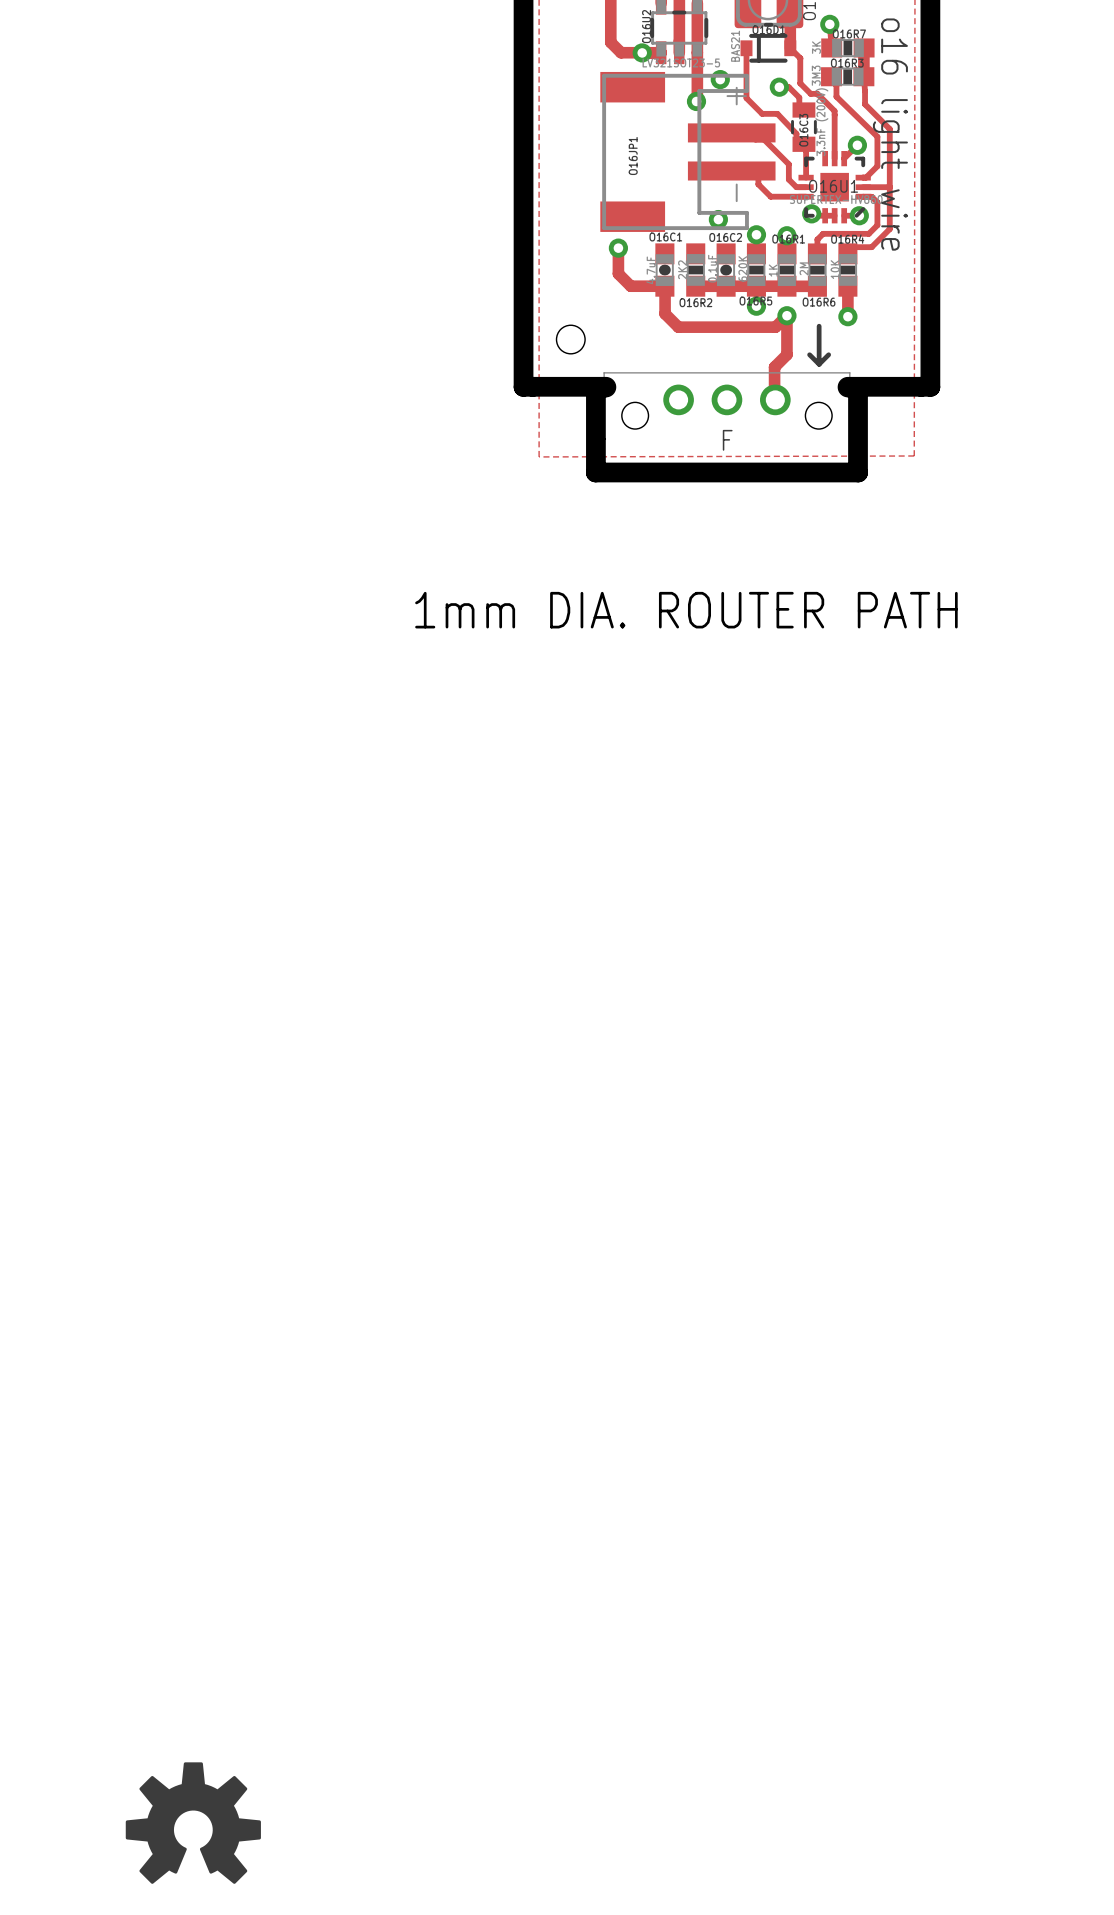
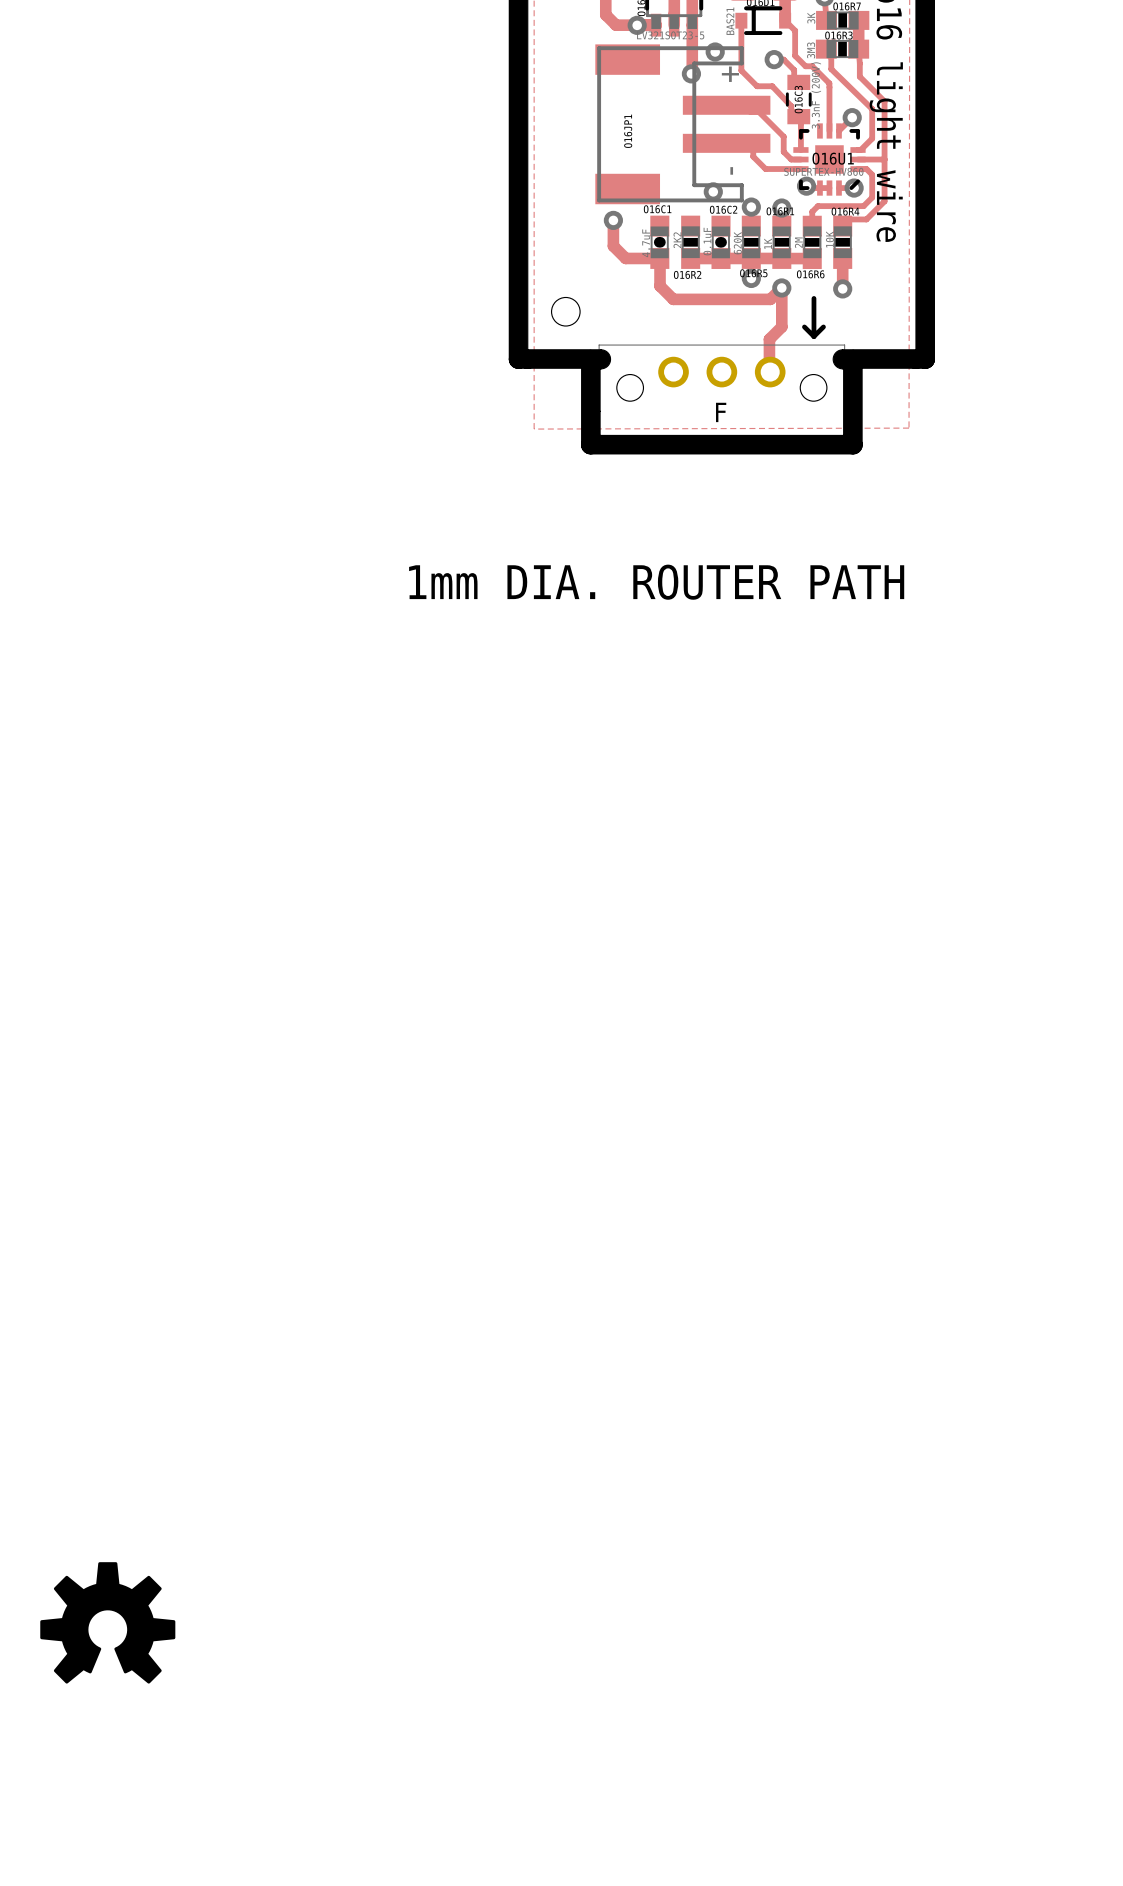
drawing position: (193, 1823) -> (107, 1622)

